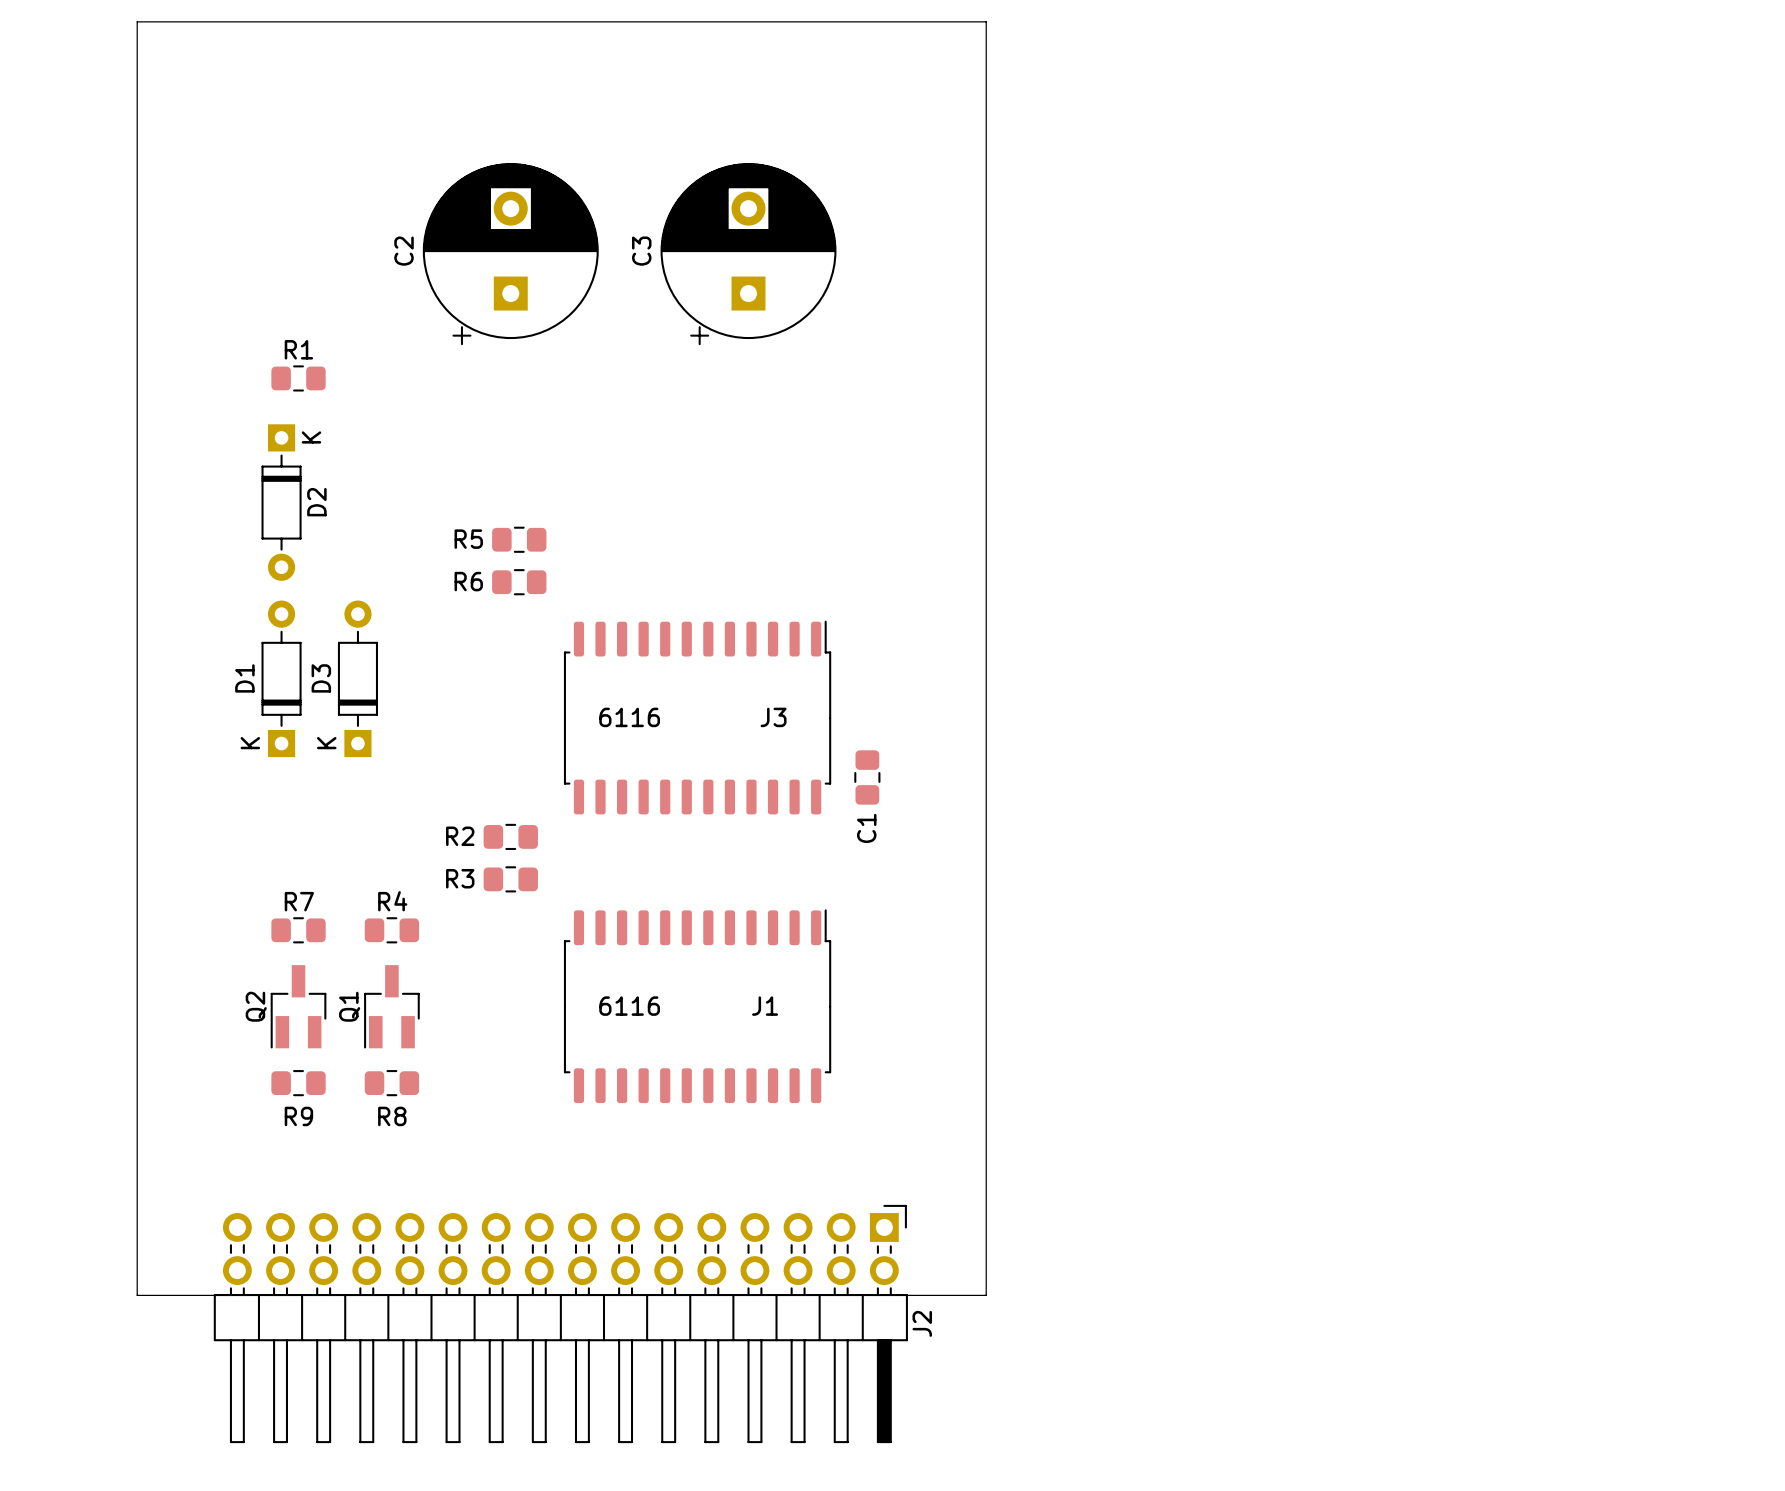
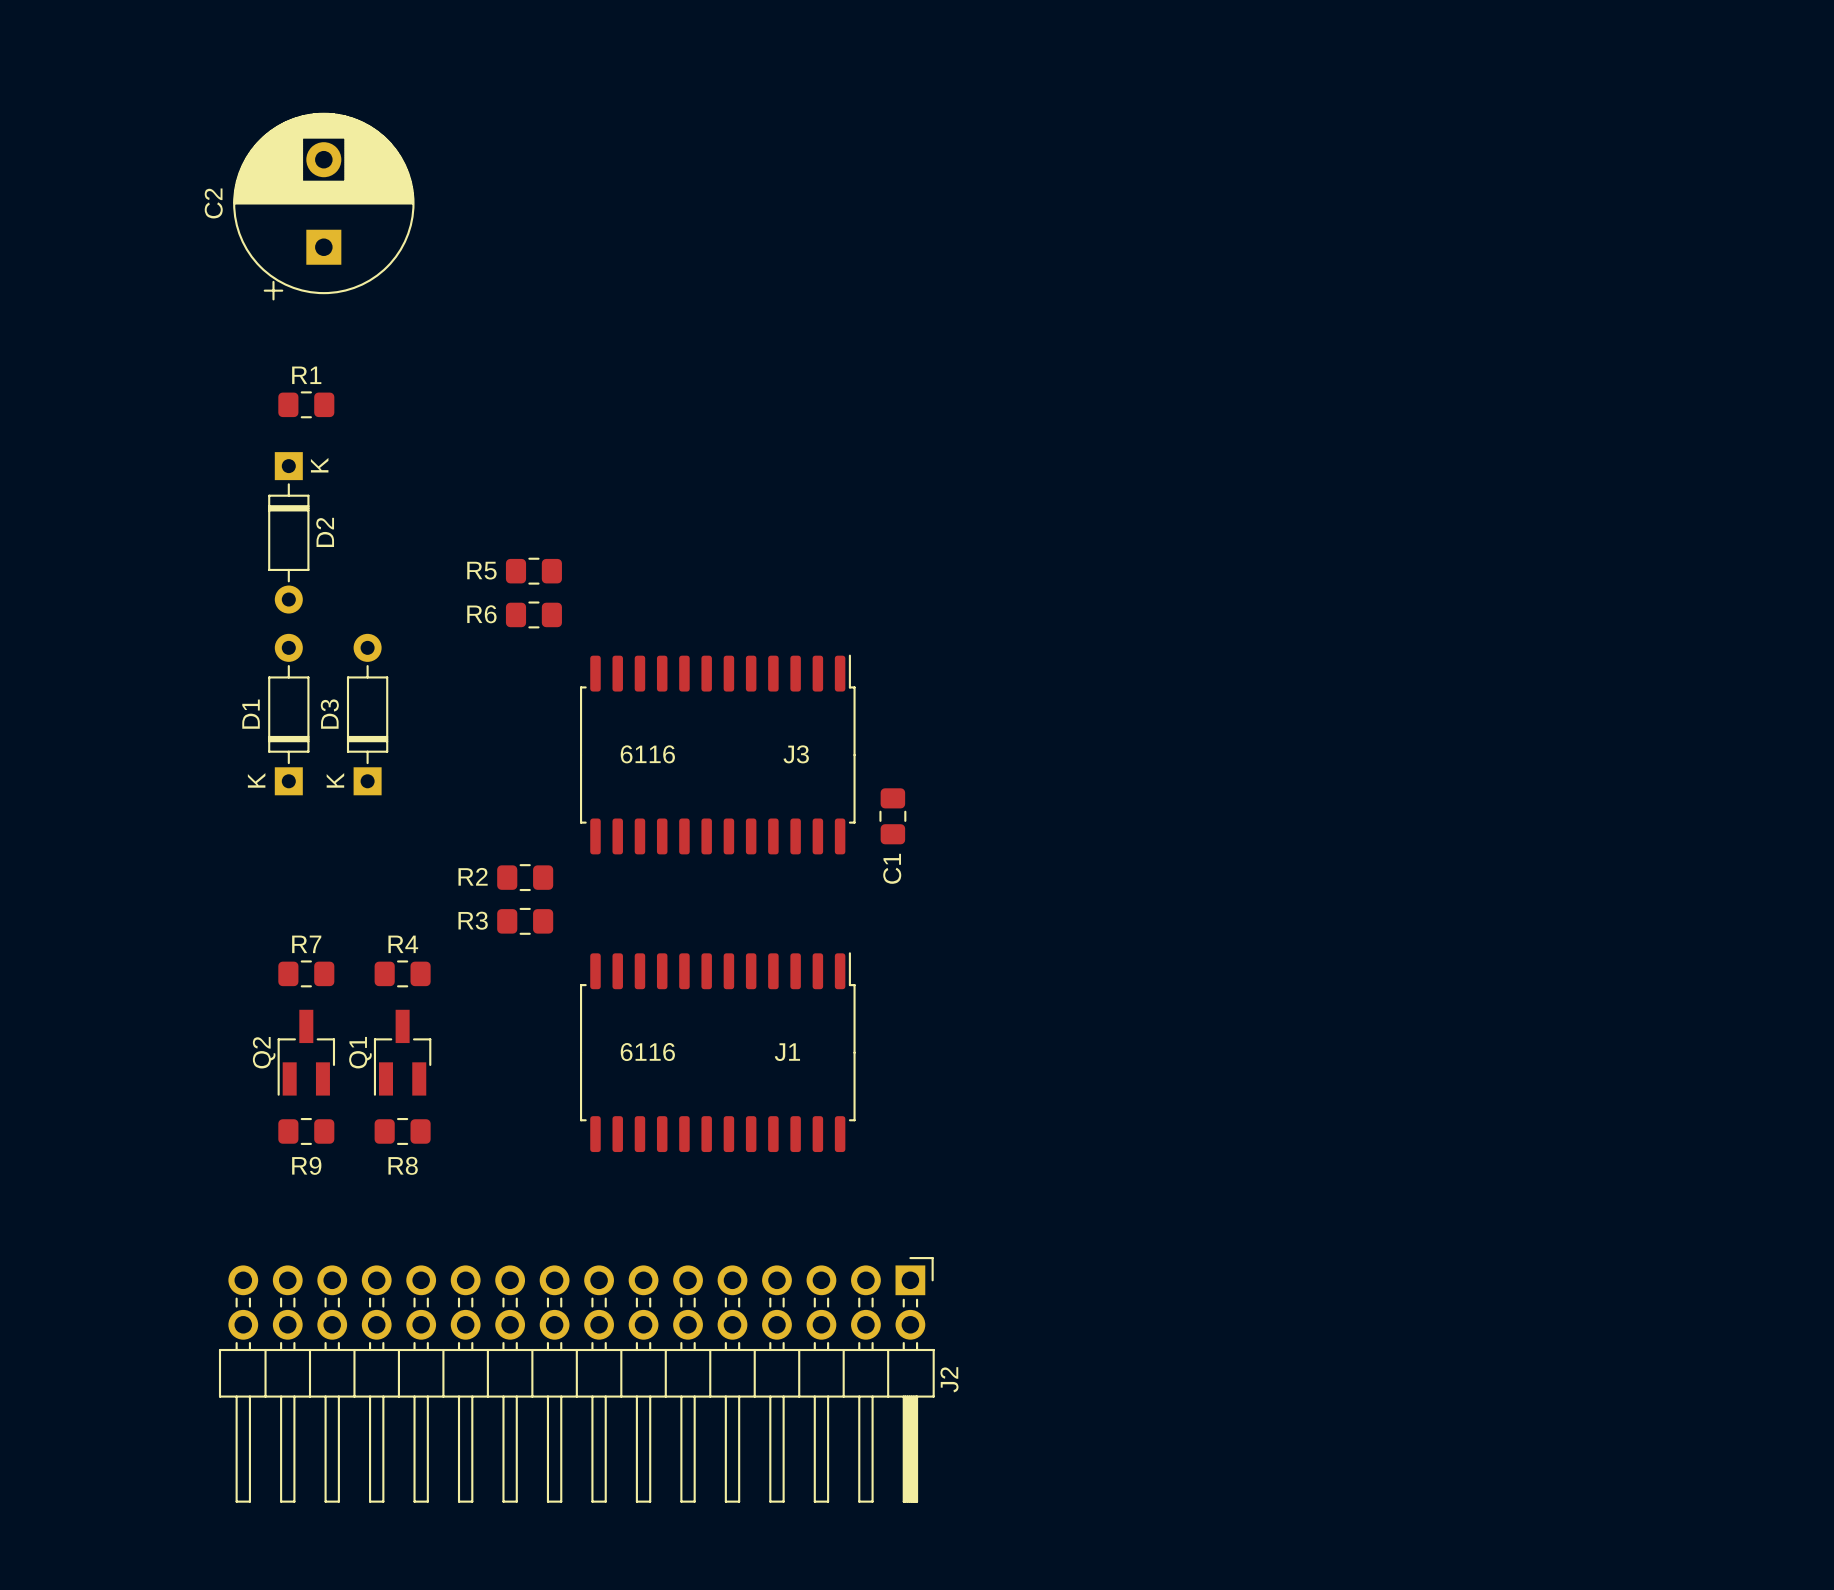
board edge: (137, 21) (137, 1295) (986, 1295) (986, 21) (137, 21) -> none
C2 position: (510, 254) -> (323, 206)
C3: (748, 254) -> none

